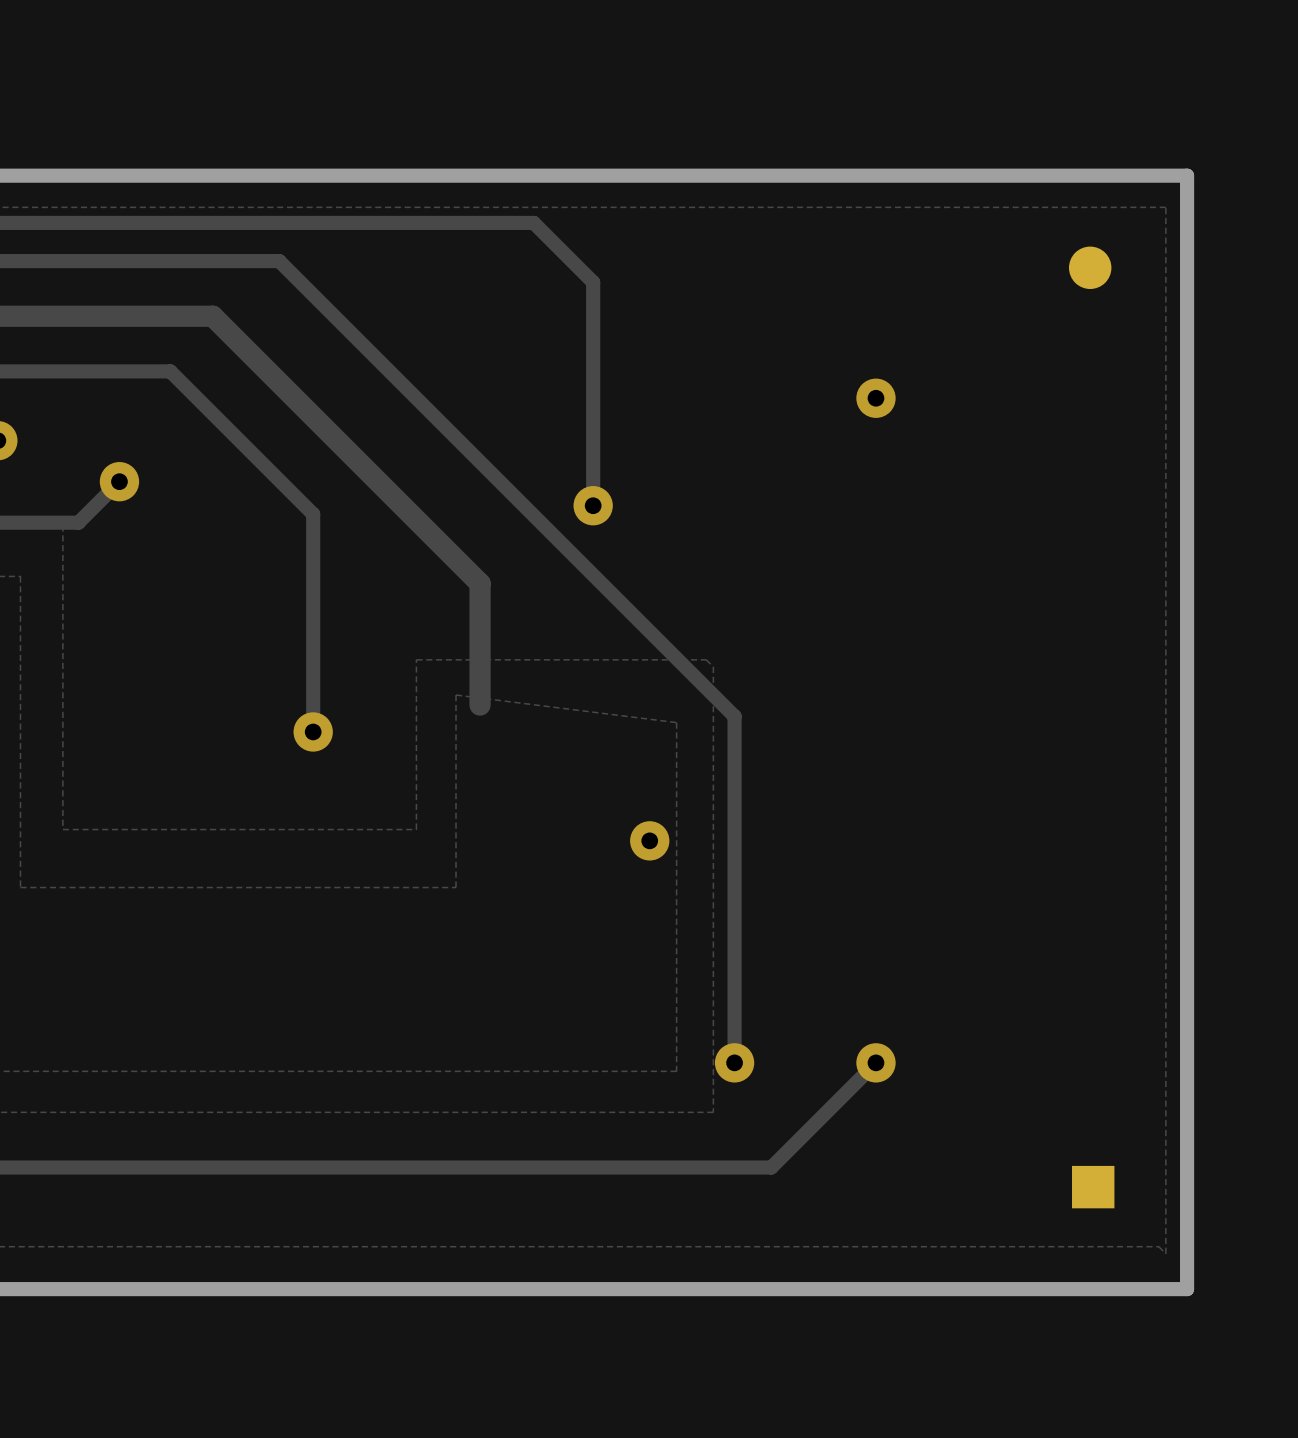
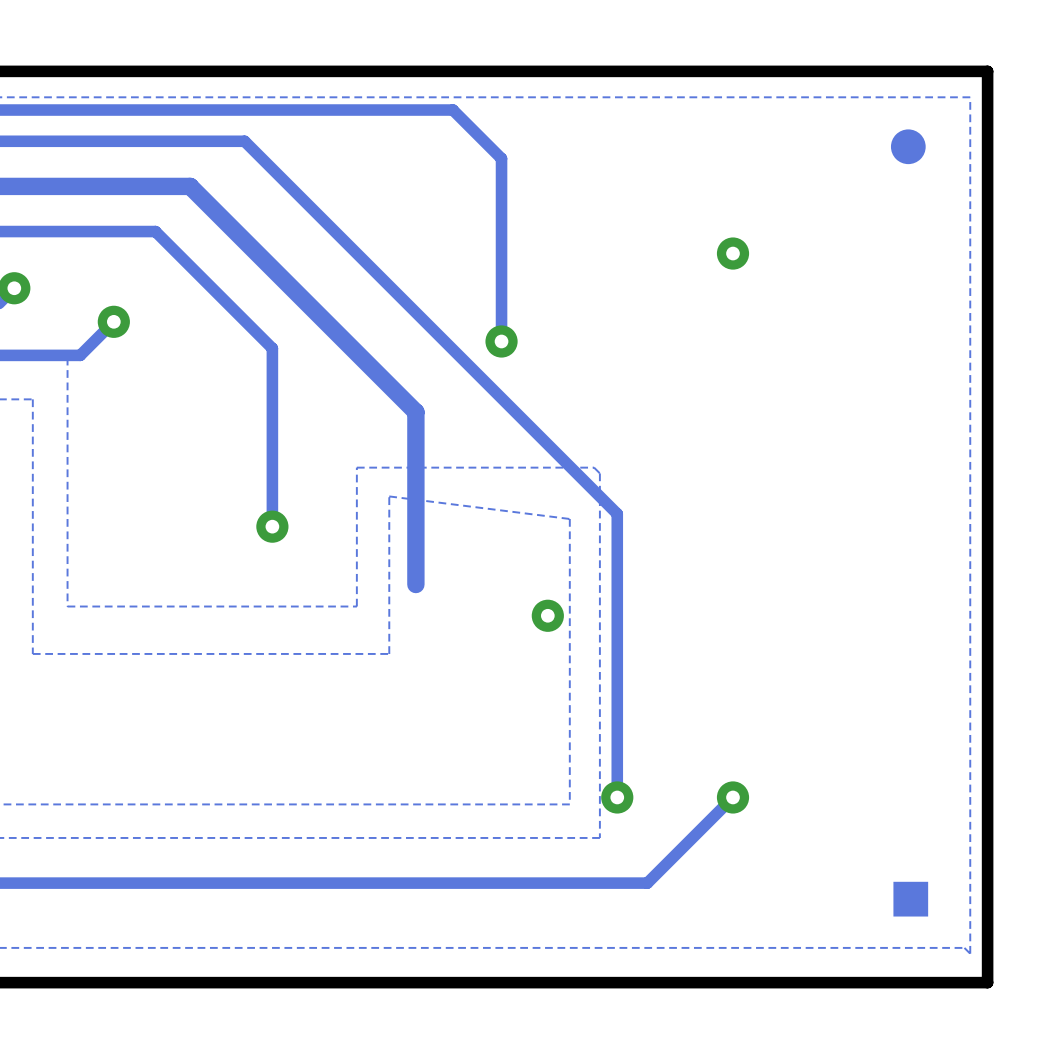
track: (480, 583) (480, 705) -> (408, 405) (415, 412) (415, 584)

